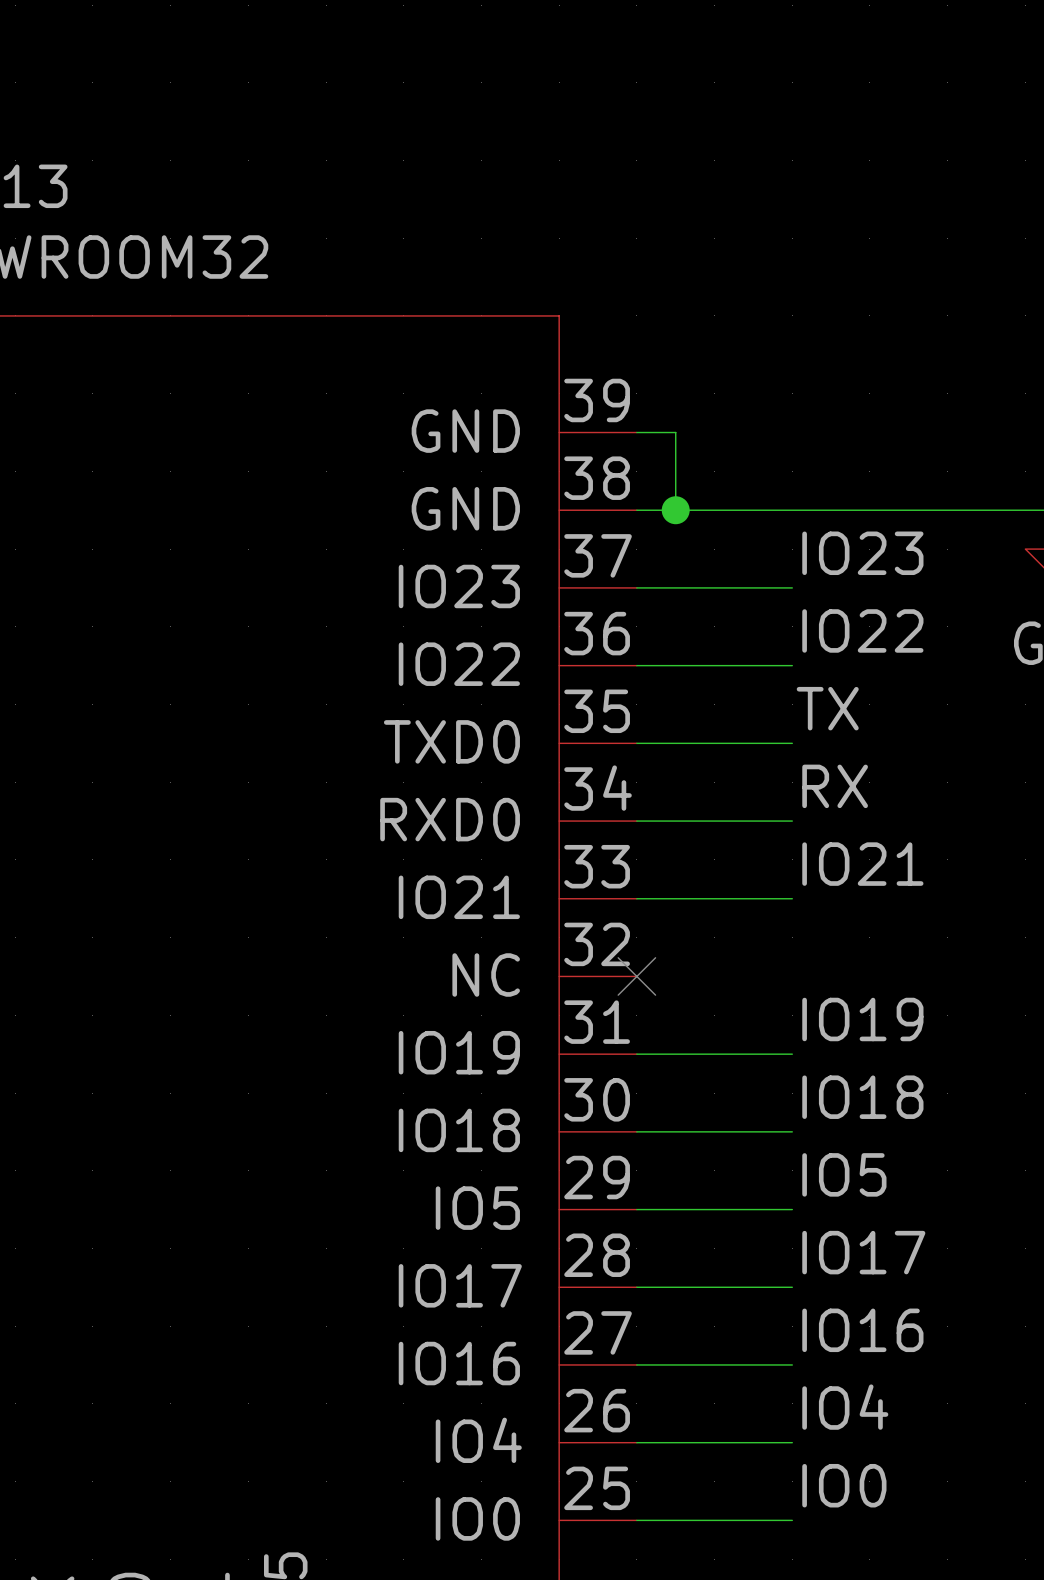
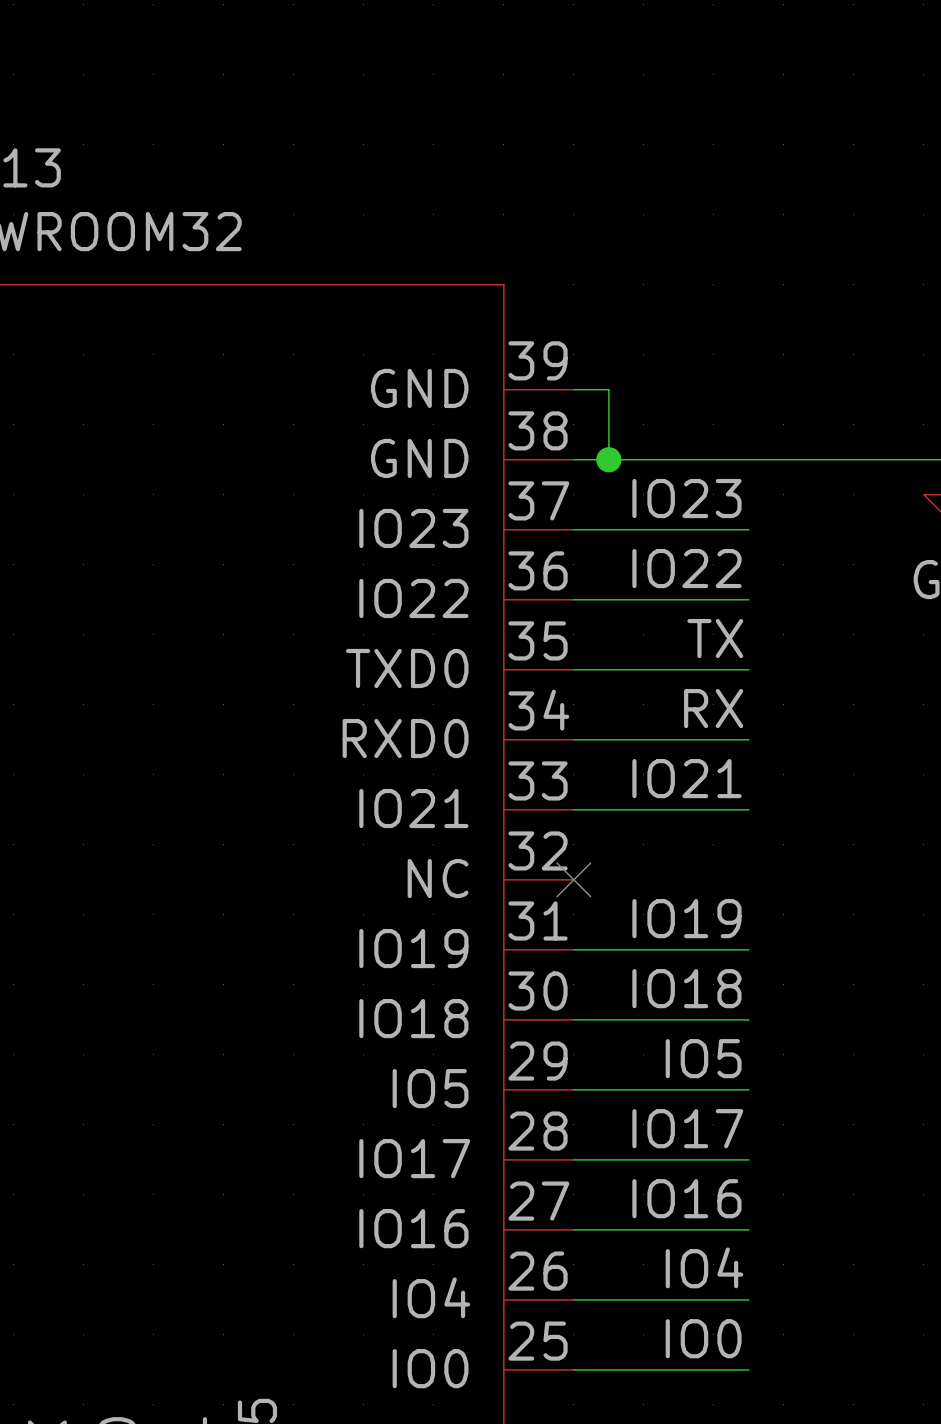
label position: IO23 (862, 553) -> IO23 (686, 498)
wire: none -> (713, 529) (748, 529)
label position: IO22 (862, 630) -> IO22 (686, 568)
wire: none -> (713, 599) (748, 599)
label position: TX (827, 708) -> TX (715, 638)
wire: none -> (713, 669) (748, 669)
label position: RX (835, 786) -> RX (713, 708)
wire: none -> (713, 739) (748, 739)
label position: IO21 (862, 864) -> IO21 (686, 778)
wire: none -> (713, 809) (748, 809)
label position: IO19 (862, 1019) -> IO19 (686, 918)
wire: none -> (713, 949) (748, 949)
label position: IO18 (862, 1097) -> IO18 (686, 988)
wire: none -> (713, 1019) (748, 1019)
label position: IO5 (844, 1174) -> IO5 (703, 1058)
wire: none -> (713, 1089) (748, 1089)
label position: IO17 (863, 1252) -> IO17 (687, 1128)
wire: none -> (713, 1159) (748, 1159)
label position: IO16 (862, 1330) -> IO16 (686, 1198)
wire: none -> (713, 1229) (748, 1229)
label position: IO4 (845, 1407) -> IO4 (704, 1267)
wire: none -> (713, 1299) (748, 1299)
label position: IO0 (844, 1485) -> IO0 (703, 1338)
wire: none -> (713, 1369) (748, 1369)

